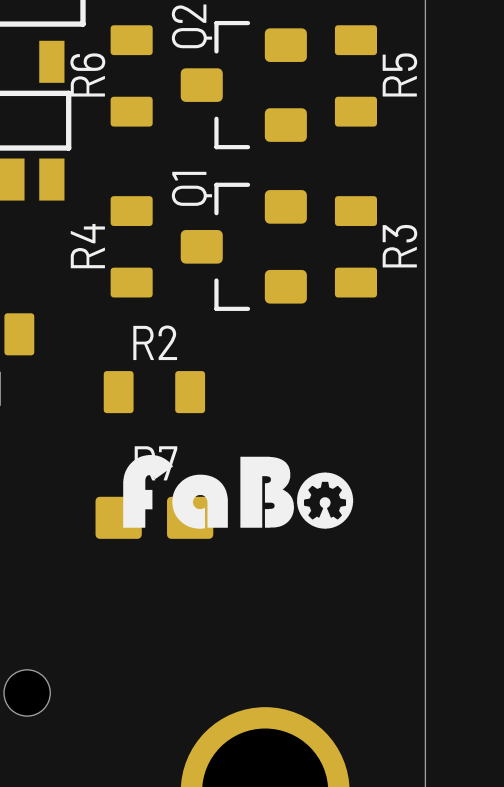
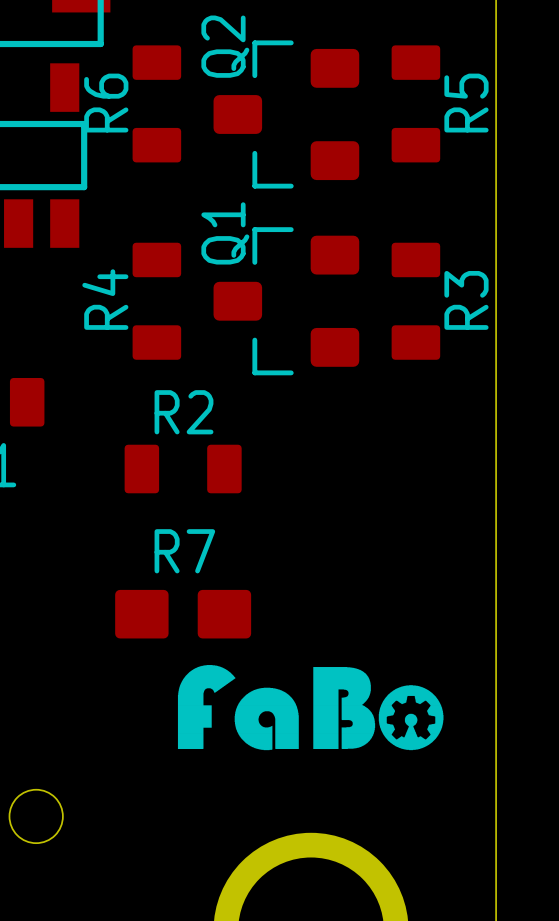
drawing position: (238, 491) -> (310, 707)

